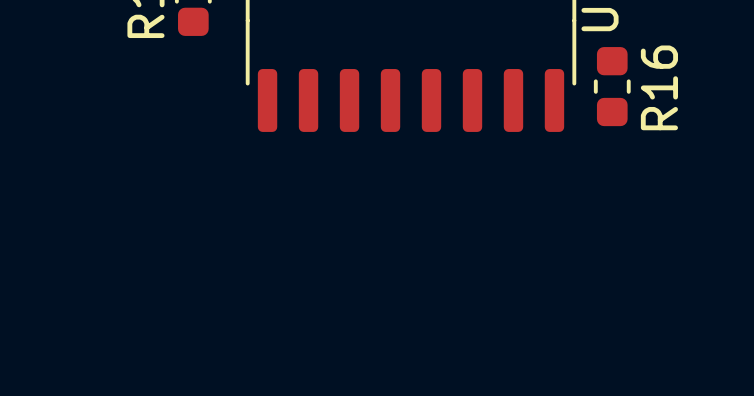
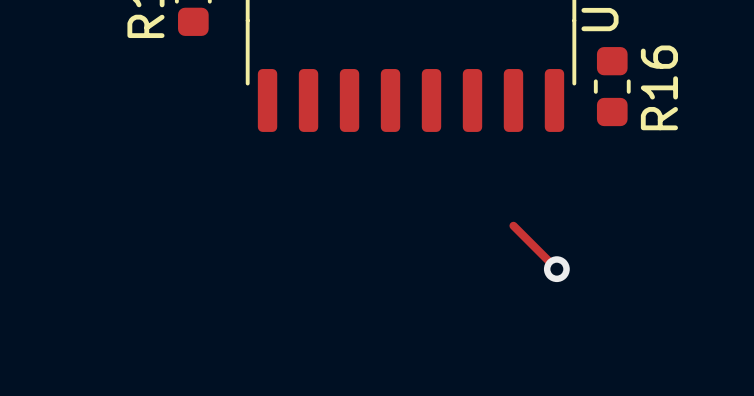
track: none -> (513, 225) (556, 269)
via: none -> (556, 269)

